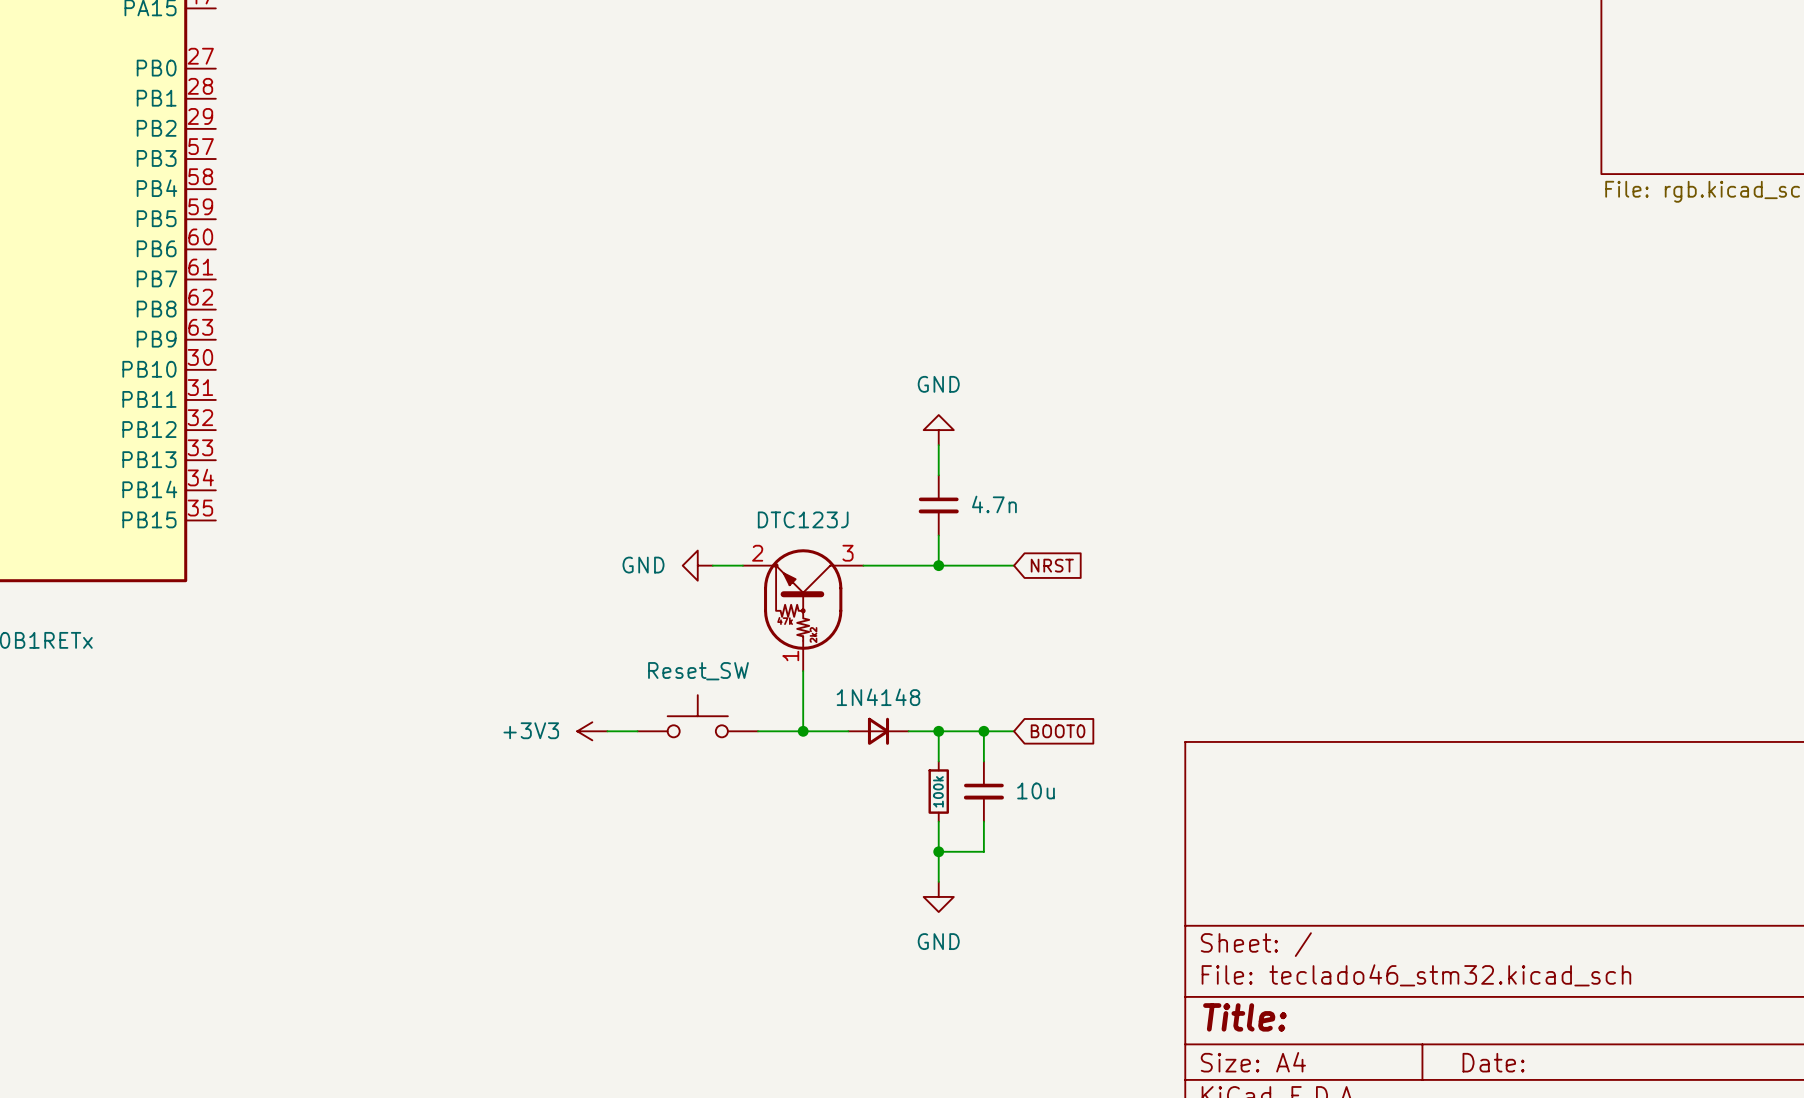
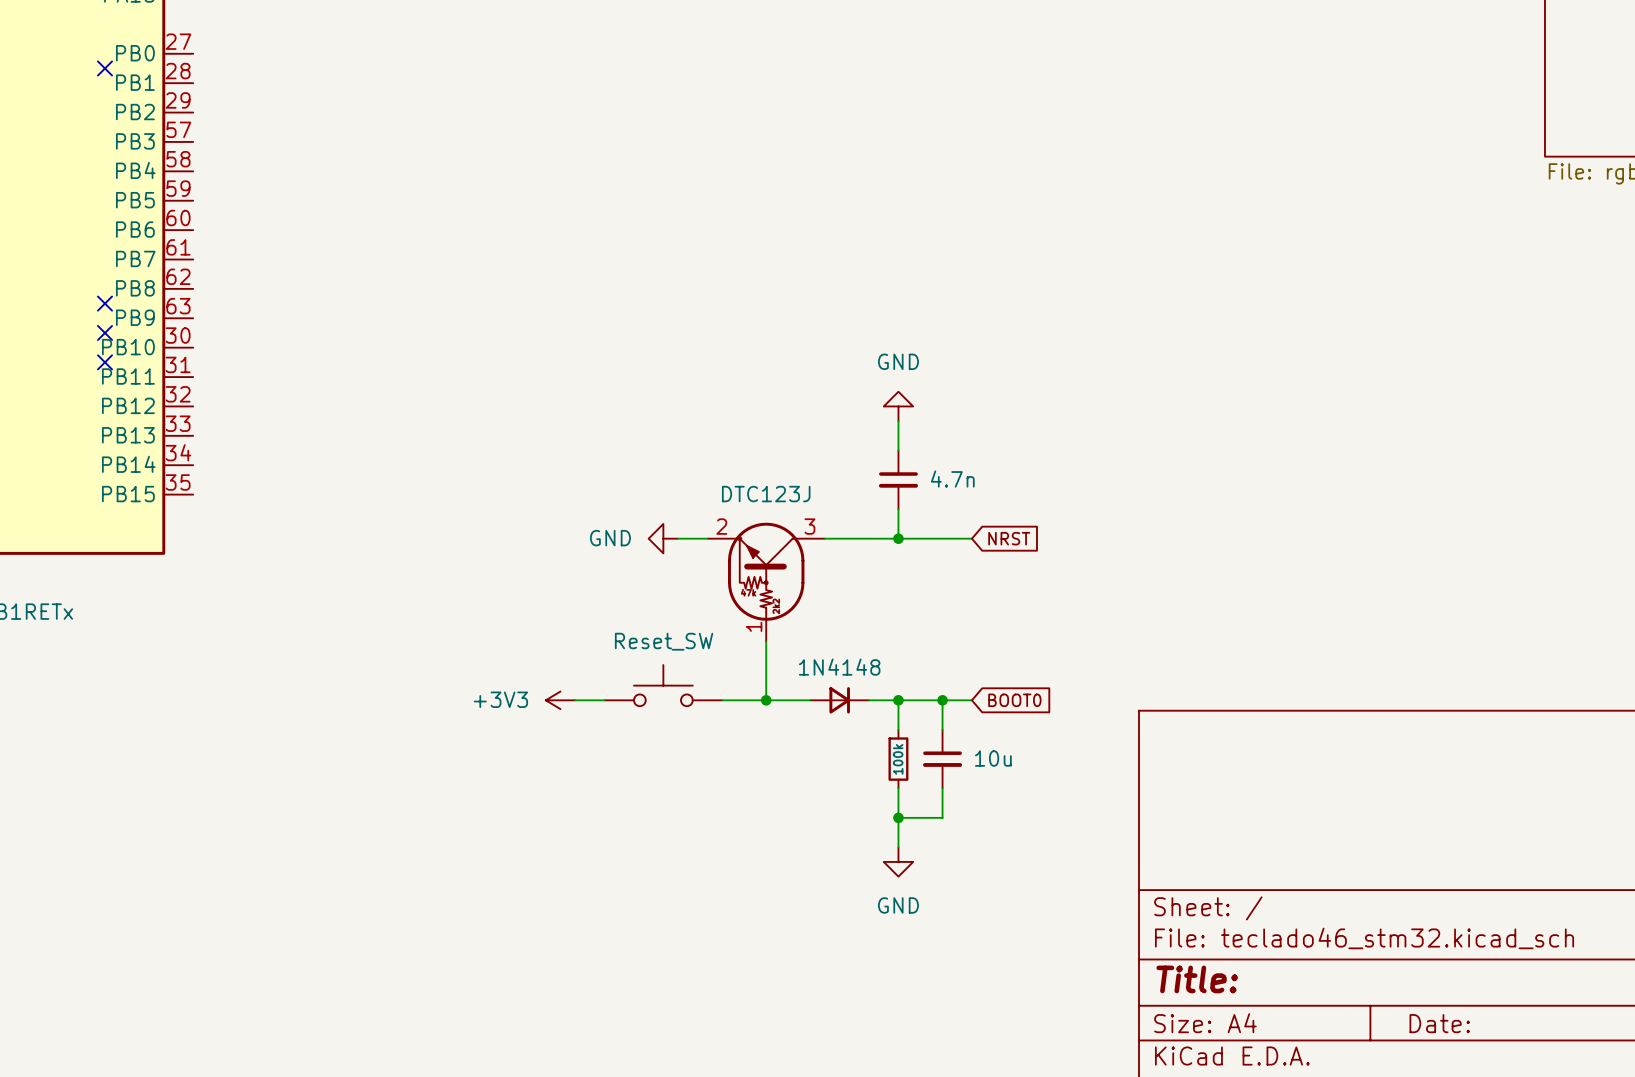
no-connect mark: none -> (105, 68)
no-connect mark: none -> (105, 303)
no-connect mark: none -> (105, 332)
no-connect mark: none -> (105, 362)

